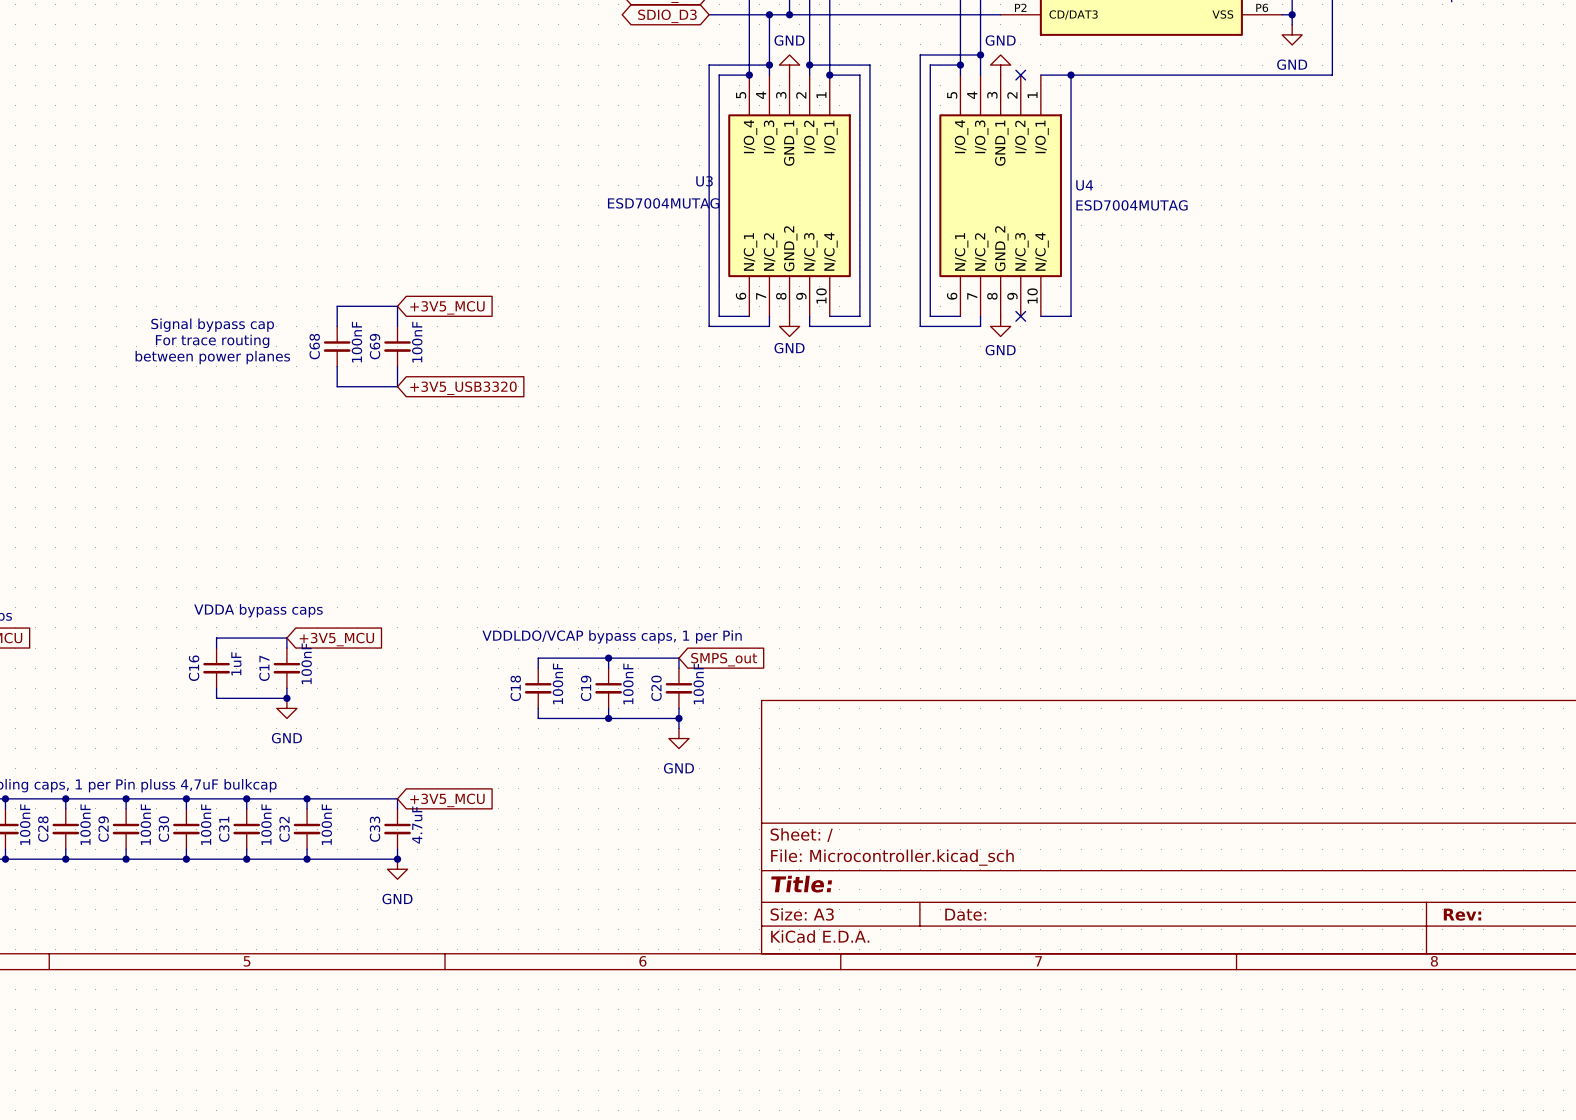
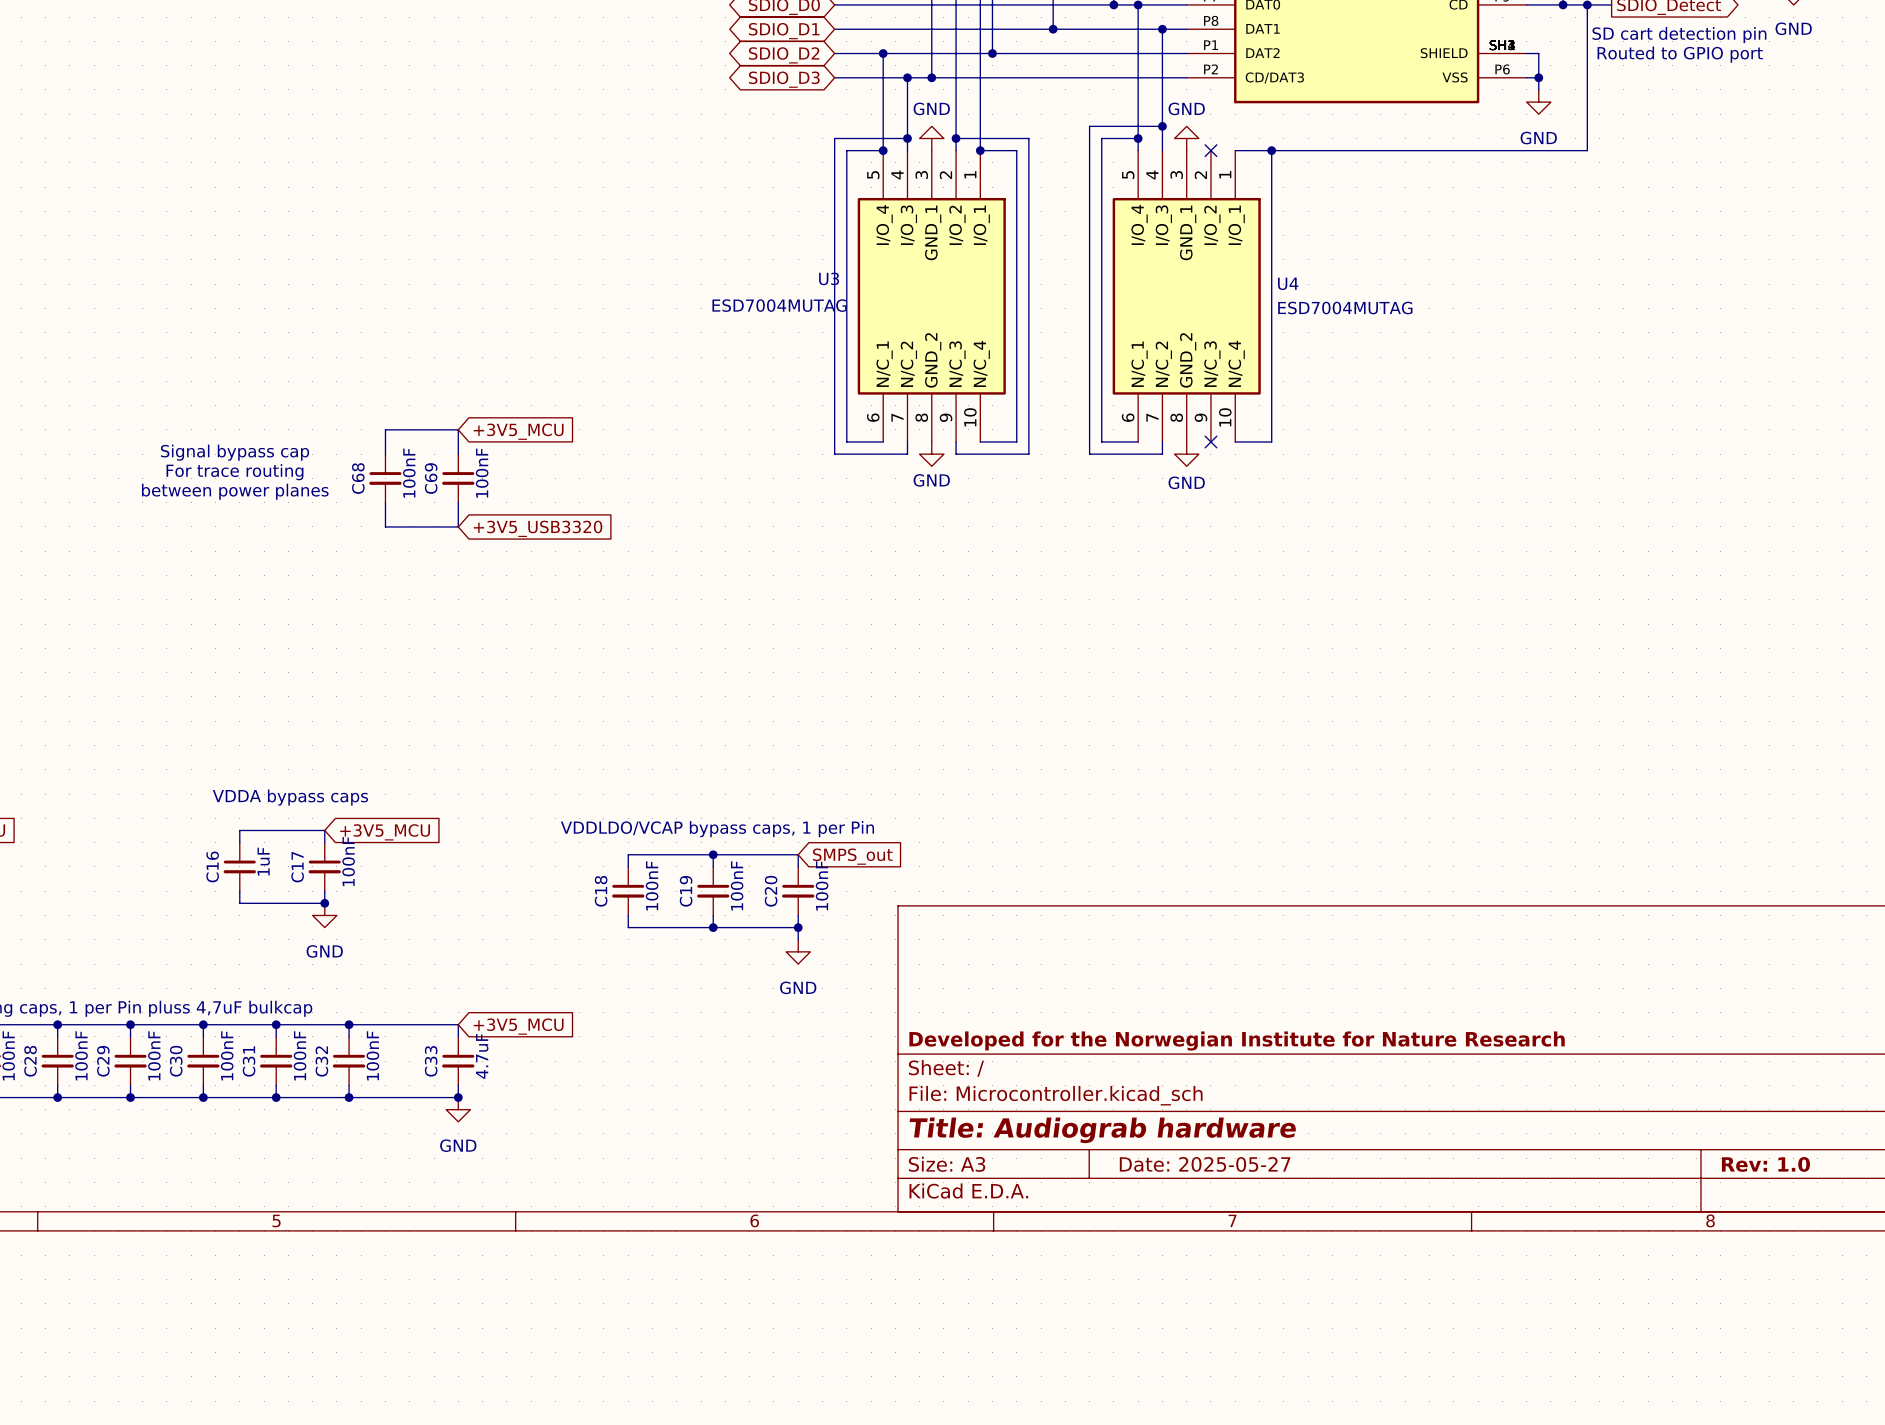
title block: none -> Developed for the Norwegian Institute for Nature Research (1237, 1041)
title block: Title: (801, 884) -> Title: Audiograb hardware (1102, 1130)
title block: Date: (965, 914) -> Date: 2025-05-27 (1205, 1164)
title block: Rev: (1462, 914) -> Rev: 1.0 (1765, 1164)

